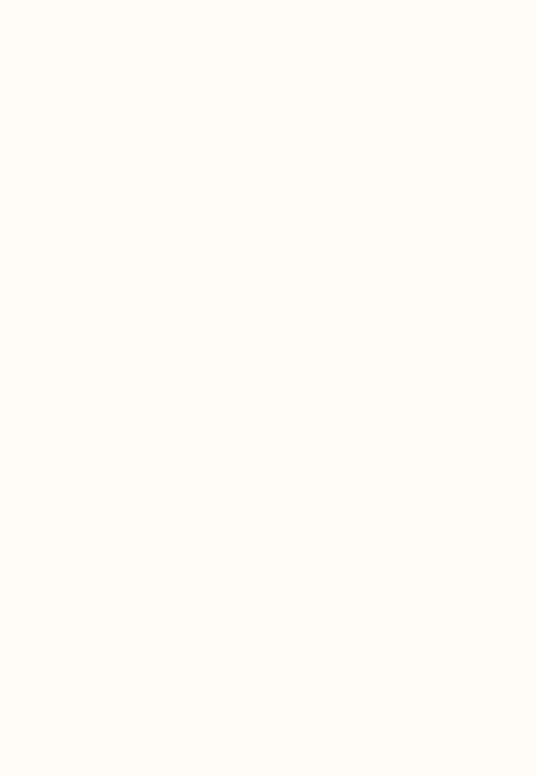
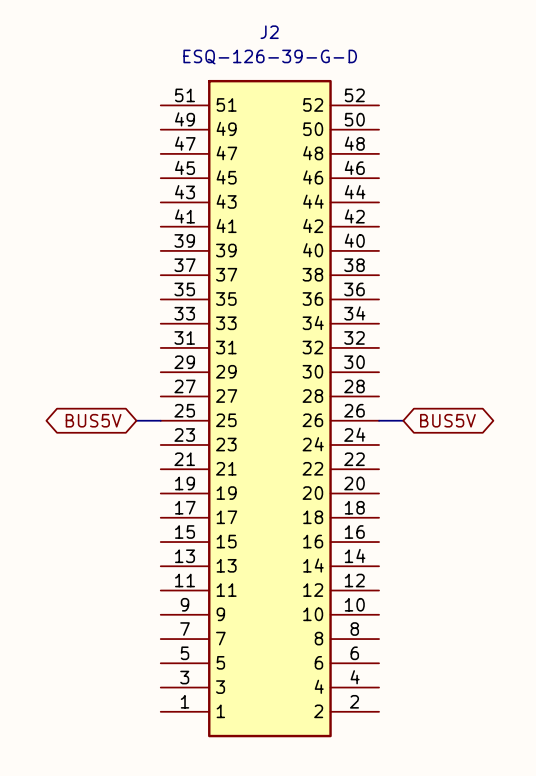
J2: none -> ESQ-126-39-G-D (269, 408)
global label: none -> BUS5V (93, 420)
wire: none -> (136, 420) (160, 420)
wire: none -> (379, 420) (403, 420)
global label: none -> BUS5V (447, 420)

